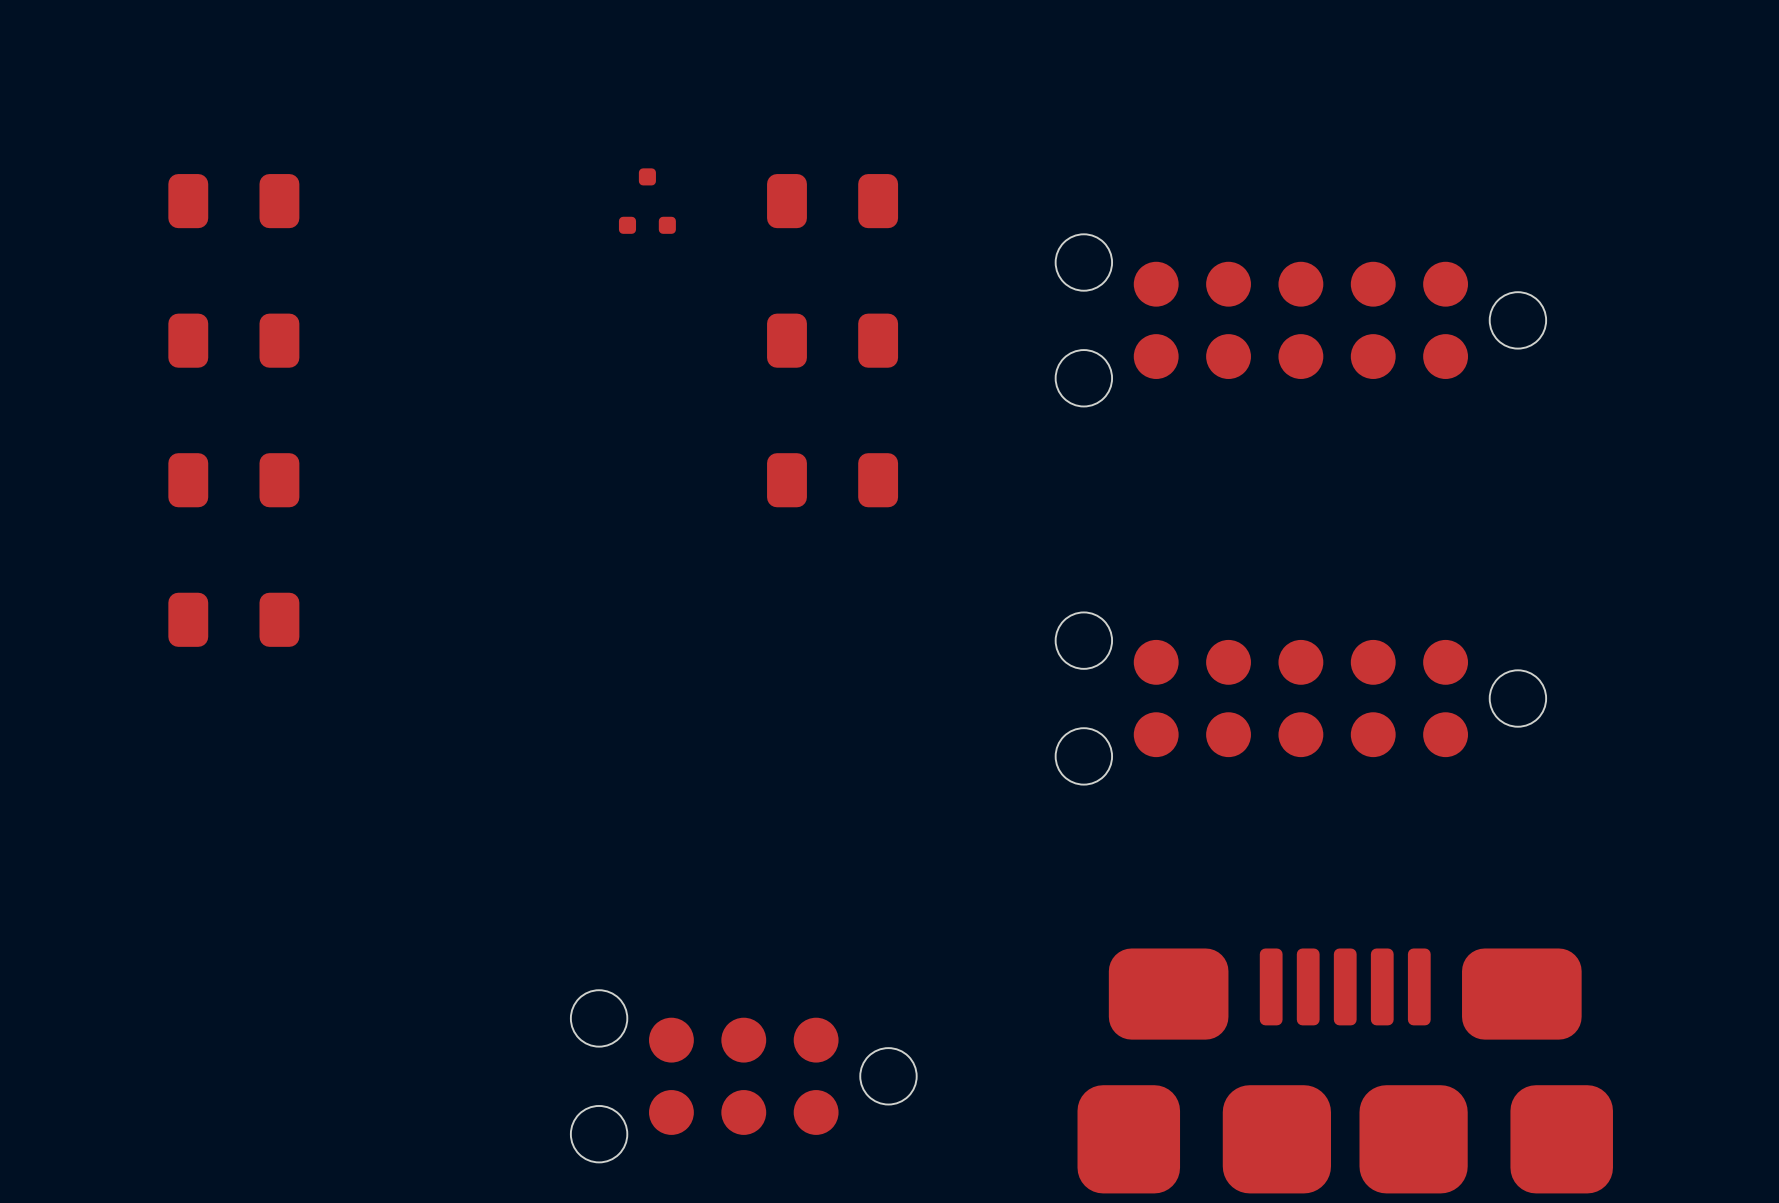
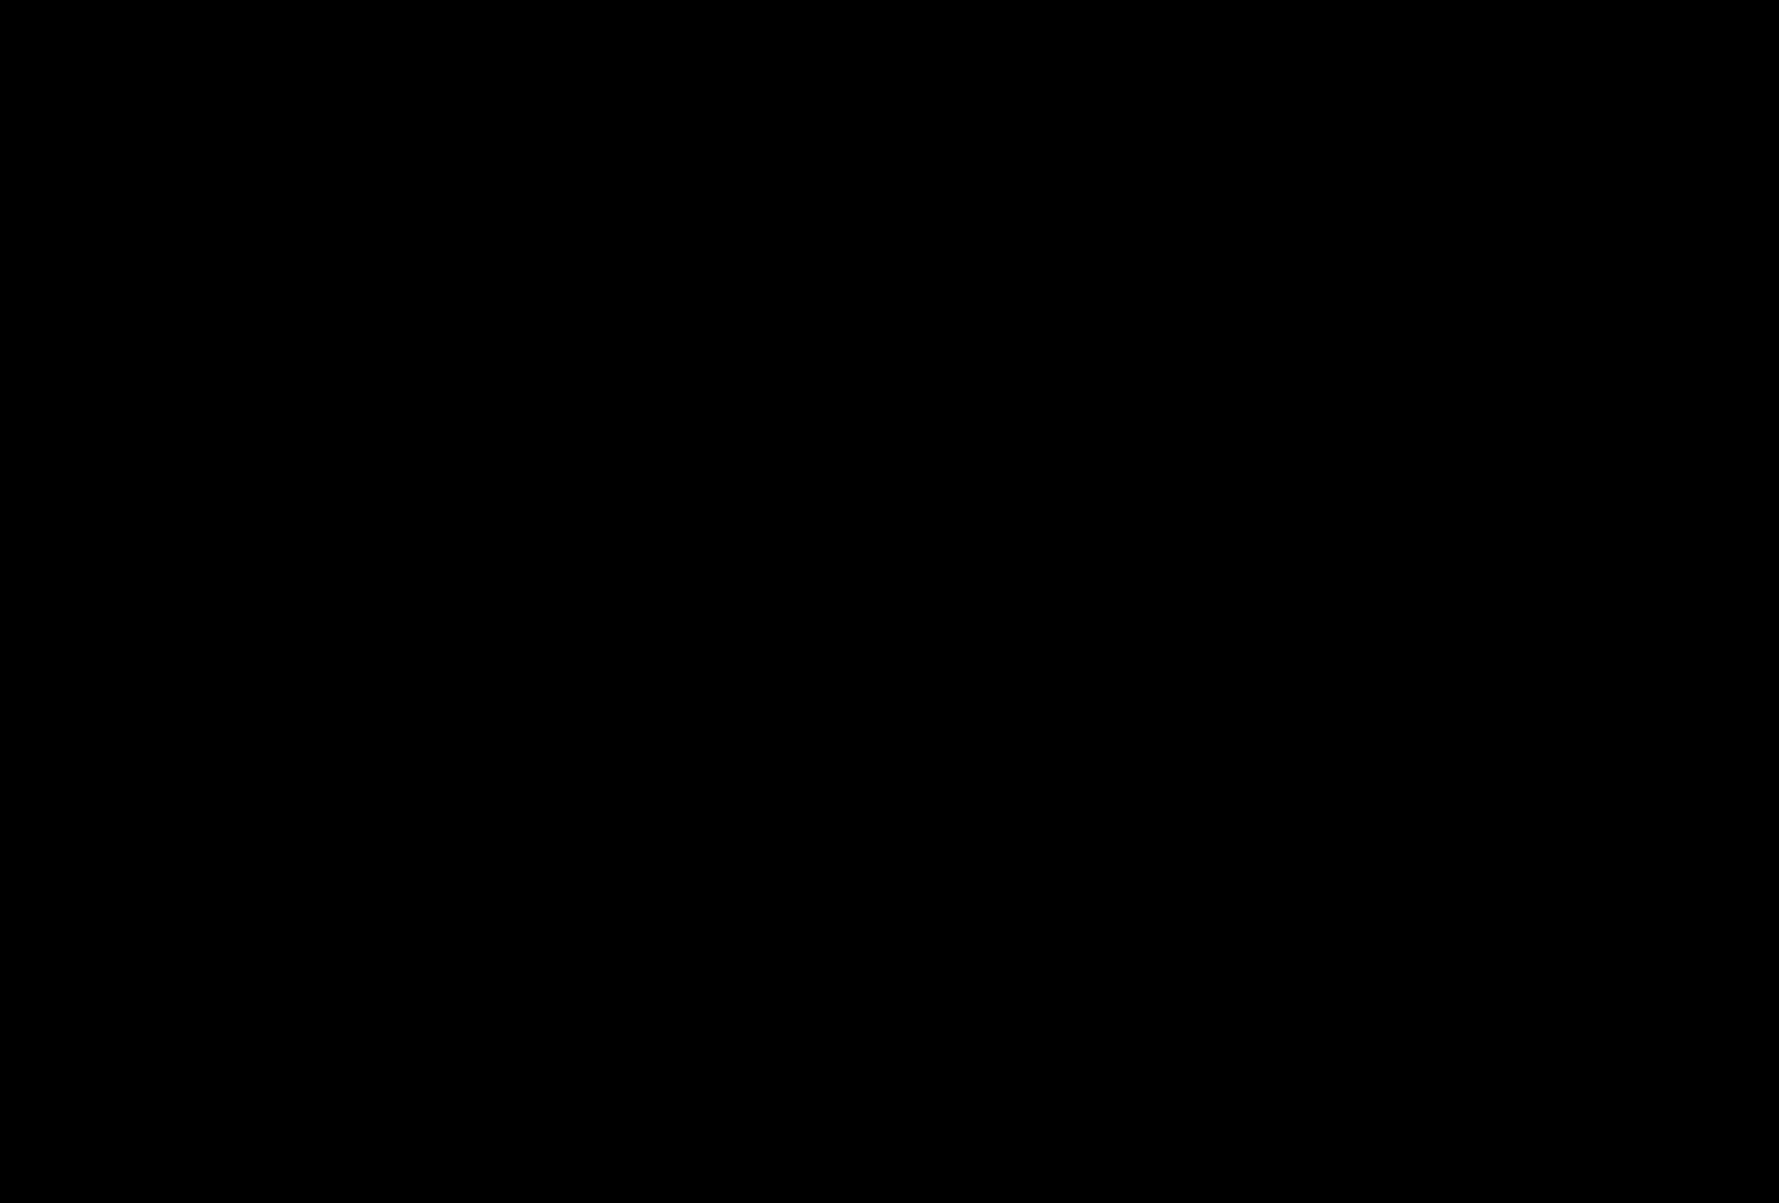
part: (233, 201) -> none
part: (647, 201) -> none
part: (832, 201) -> none
part: (1300, 320) -> none
part: (233, 340) -> none
part: (832, 340) -> none
part: (233, 480) -> none
part: (832, 480) -> none
part: (233, 619) -> none
part: (1300, 698) -> none
part: (1345, 1070) -> none
part: (743, 1076) -> none

